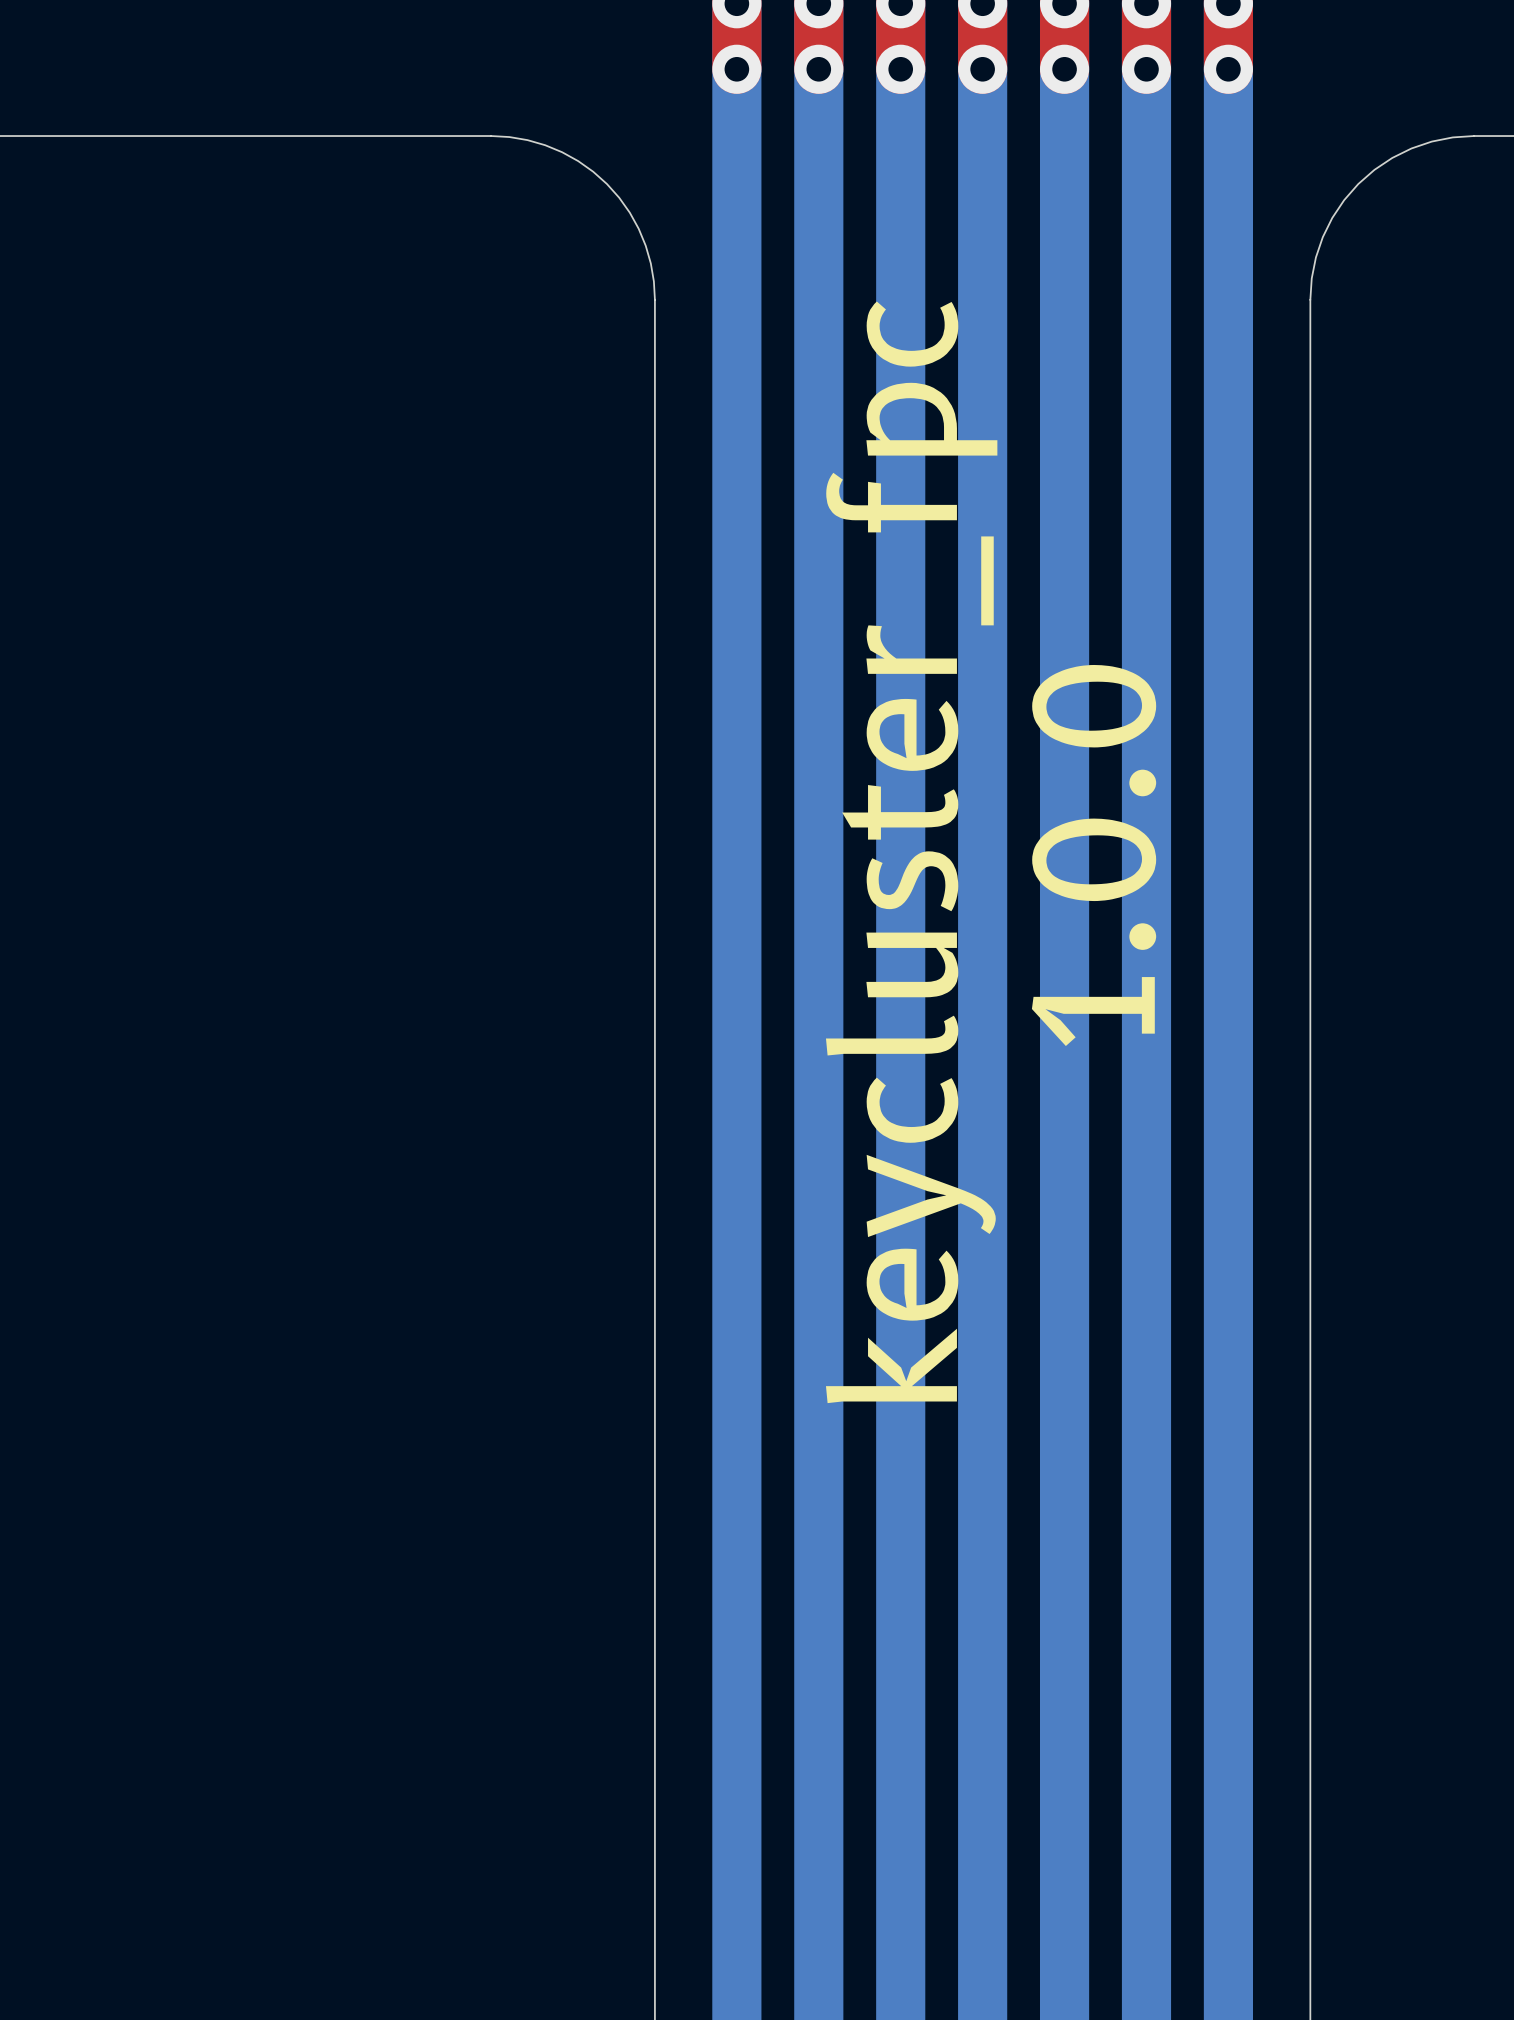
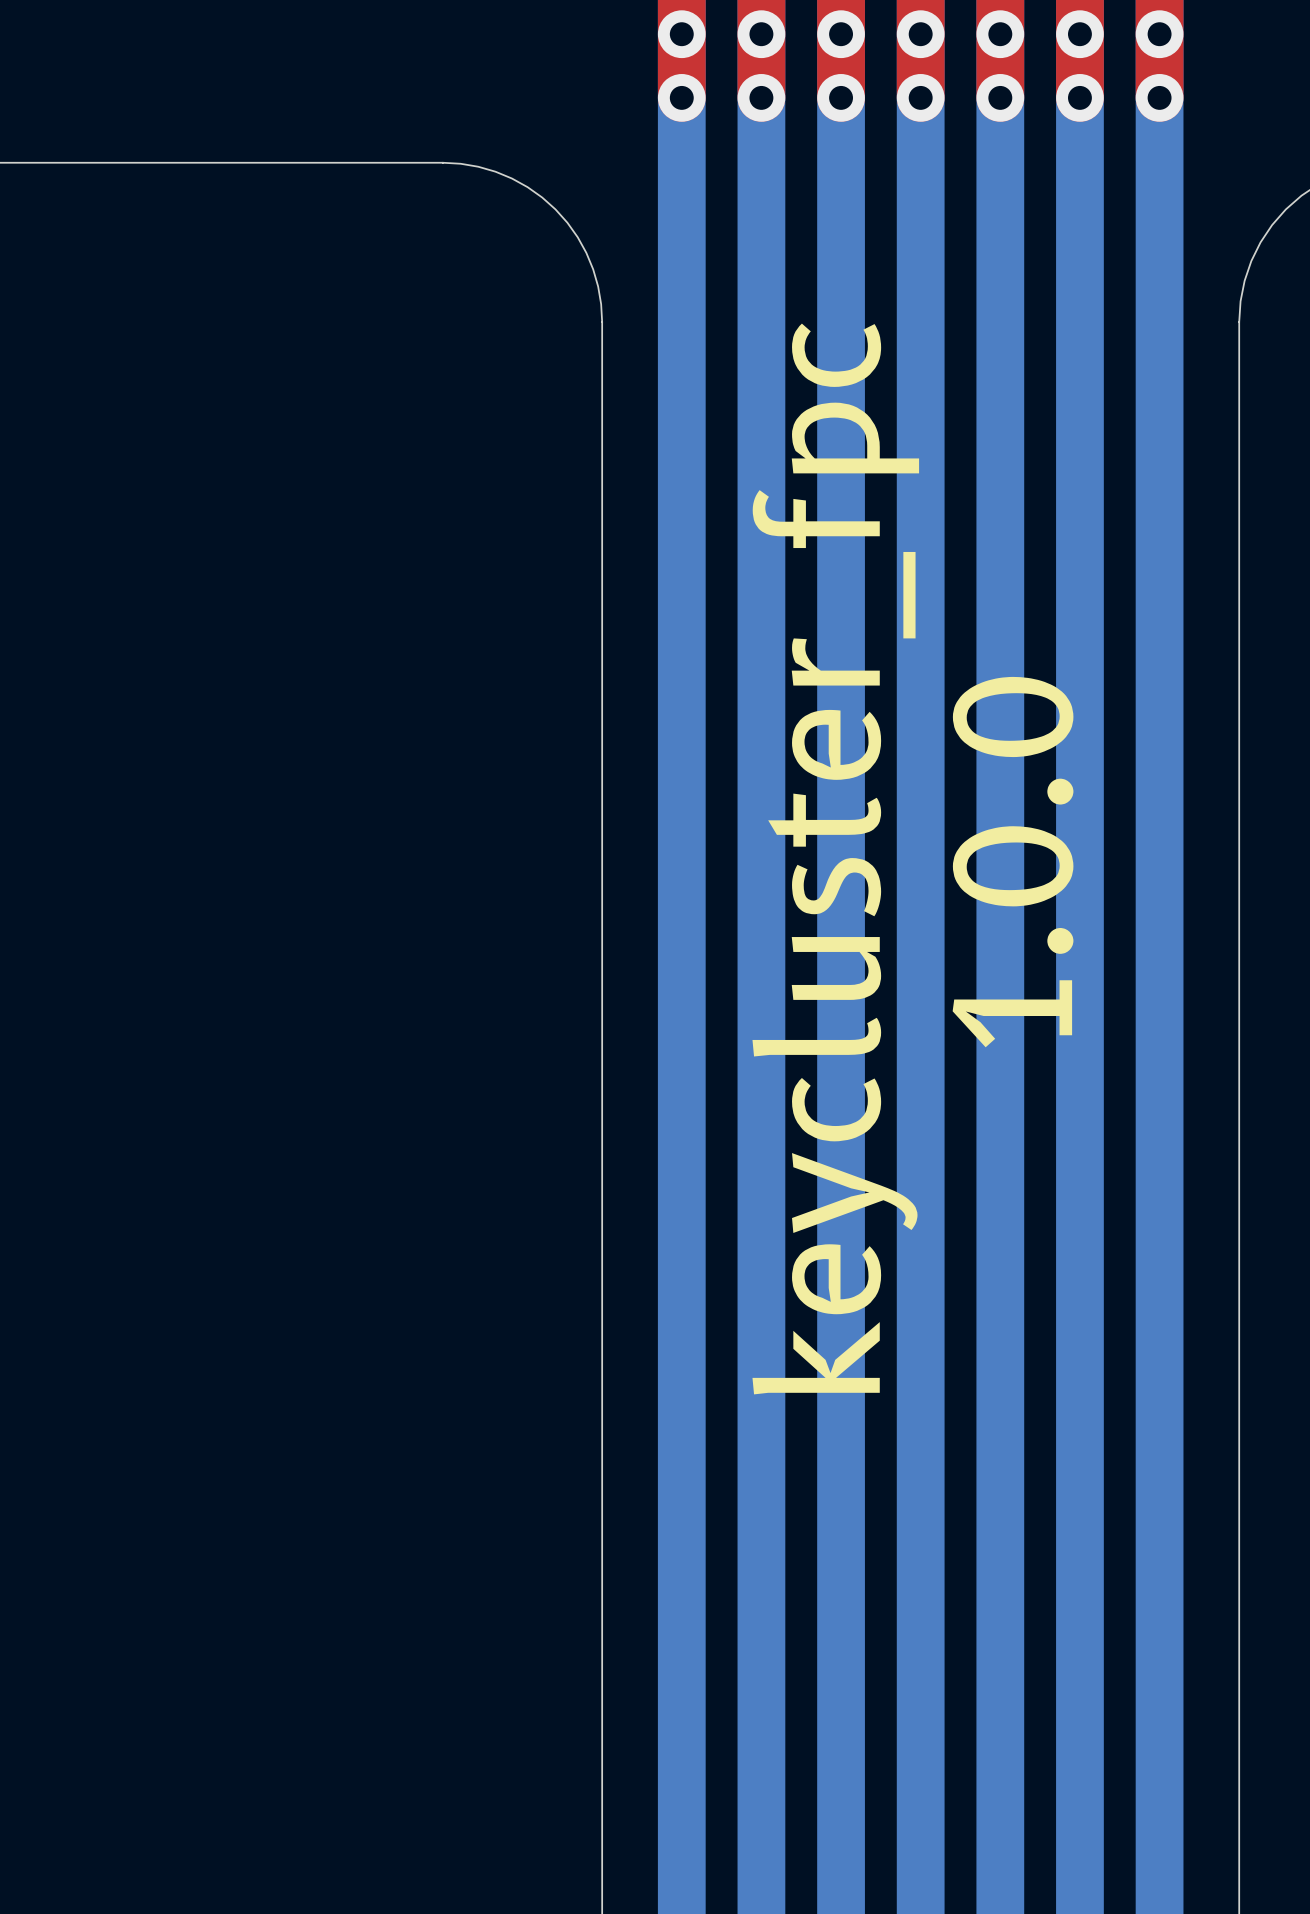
text position: keycluster_fpc (911, 852) -> keycluster_fpc (835, 858)
text position: 1.0.0 (1094, 855) -> 1.0.0 (1013, 862)

